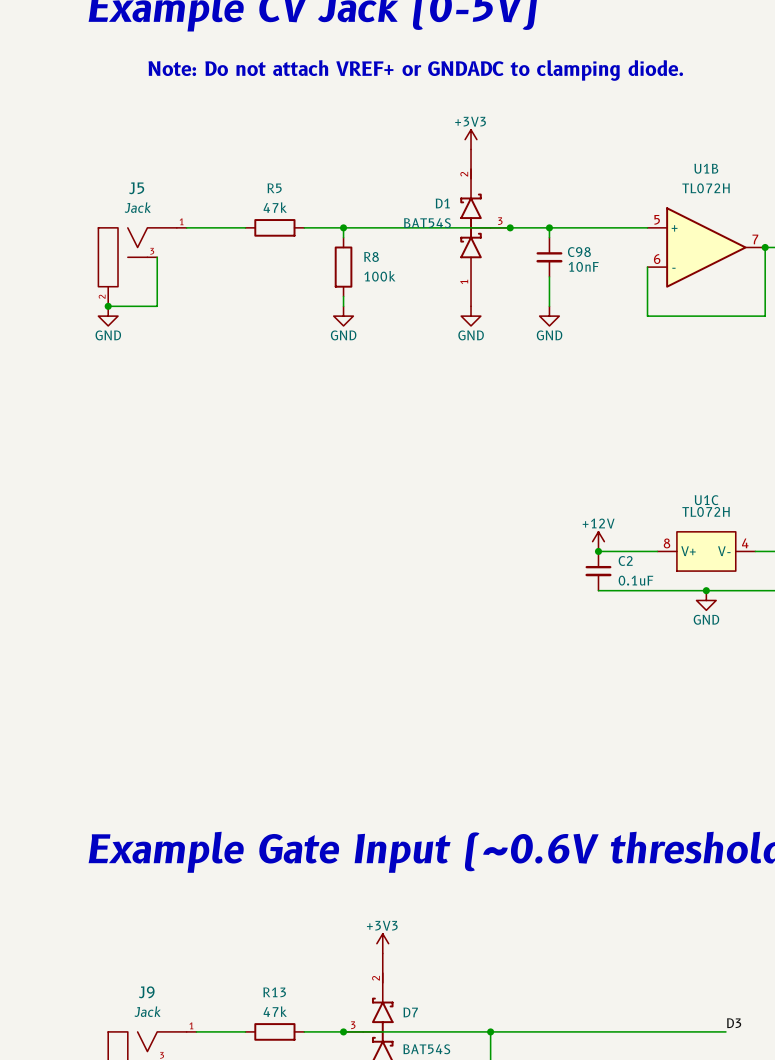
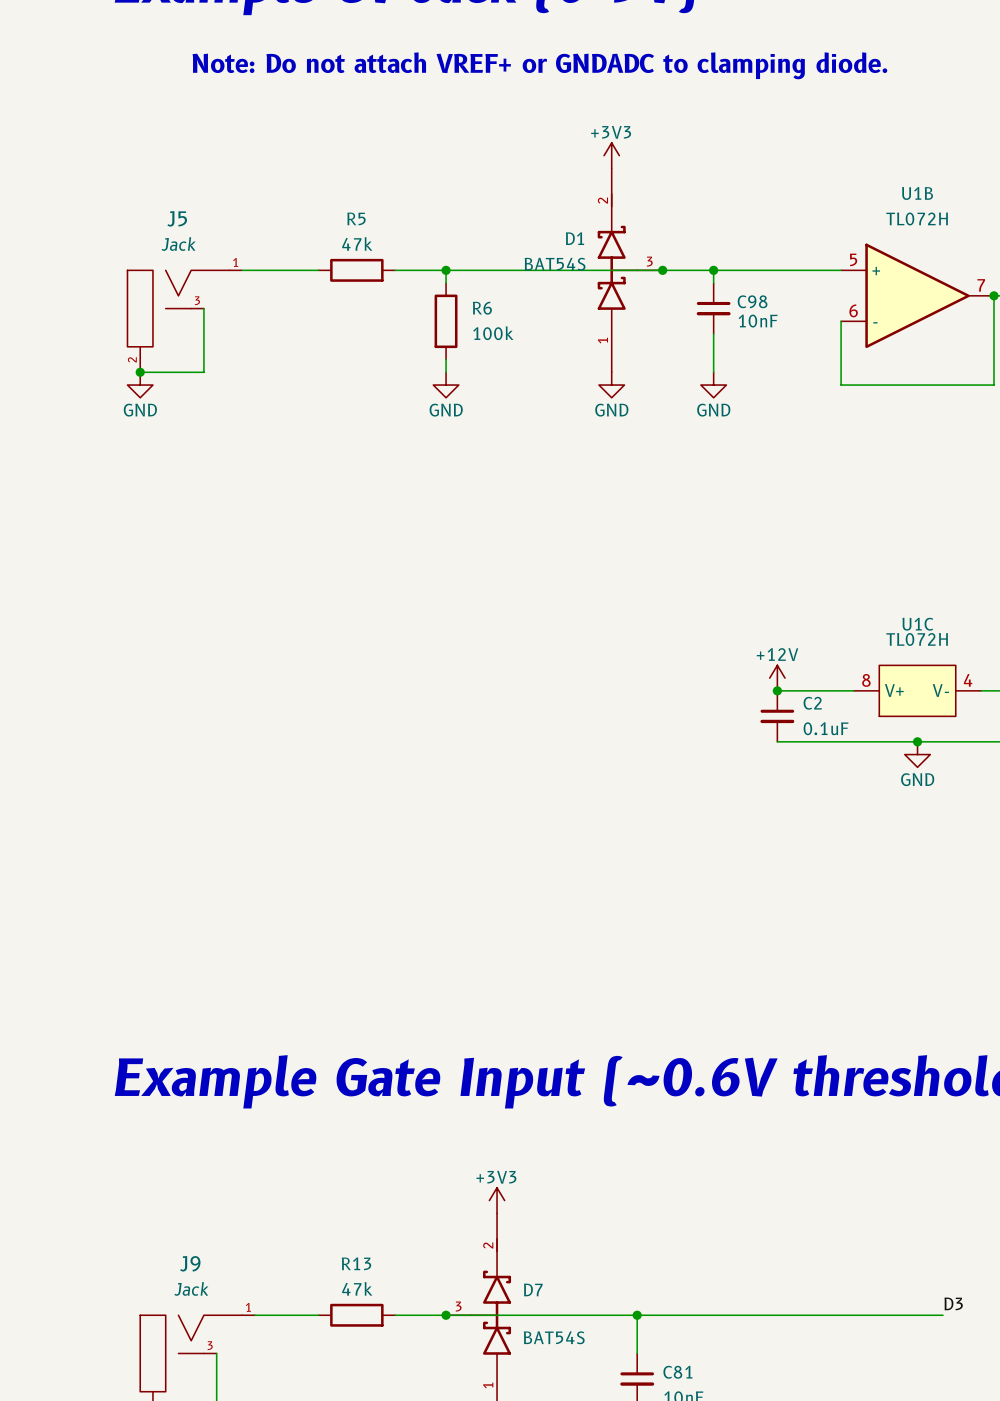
R8 name: R8 (371, 256) -> R6 (482, 308)

